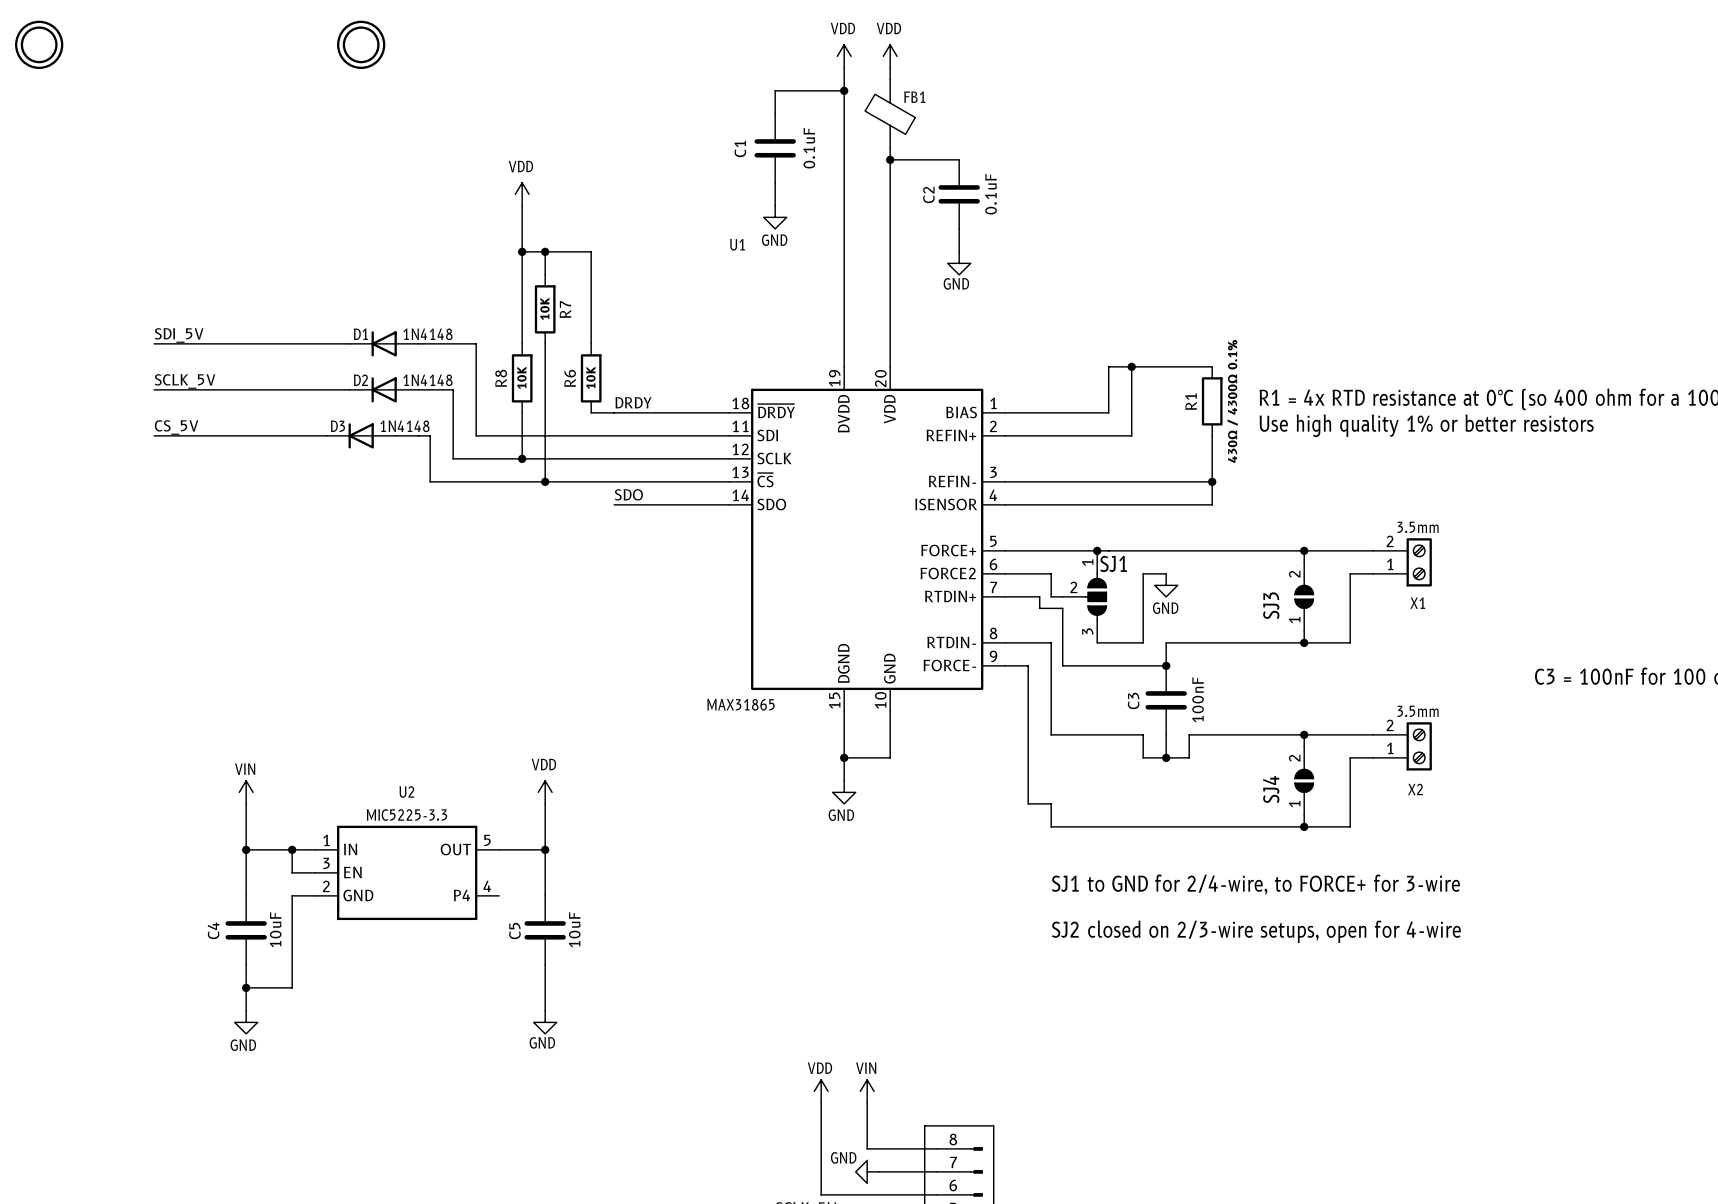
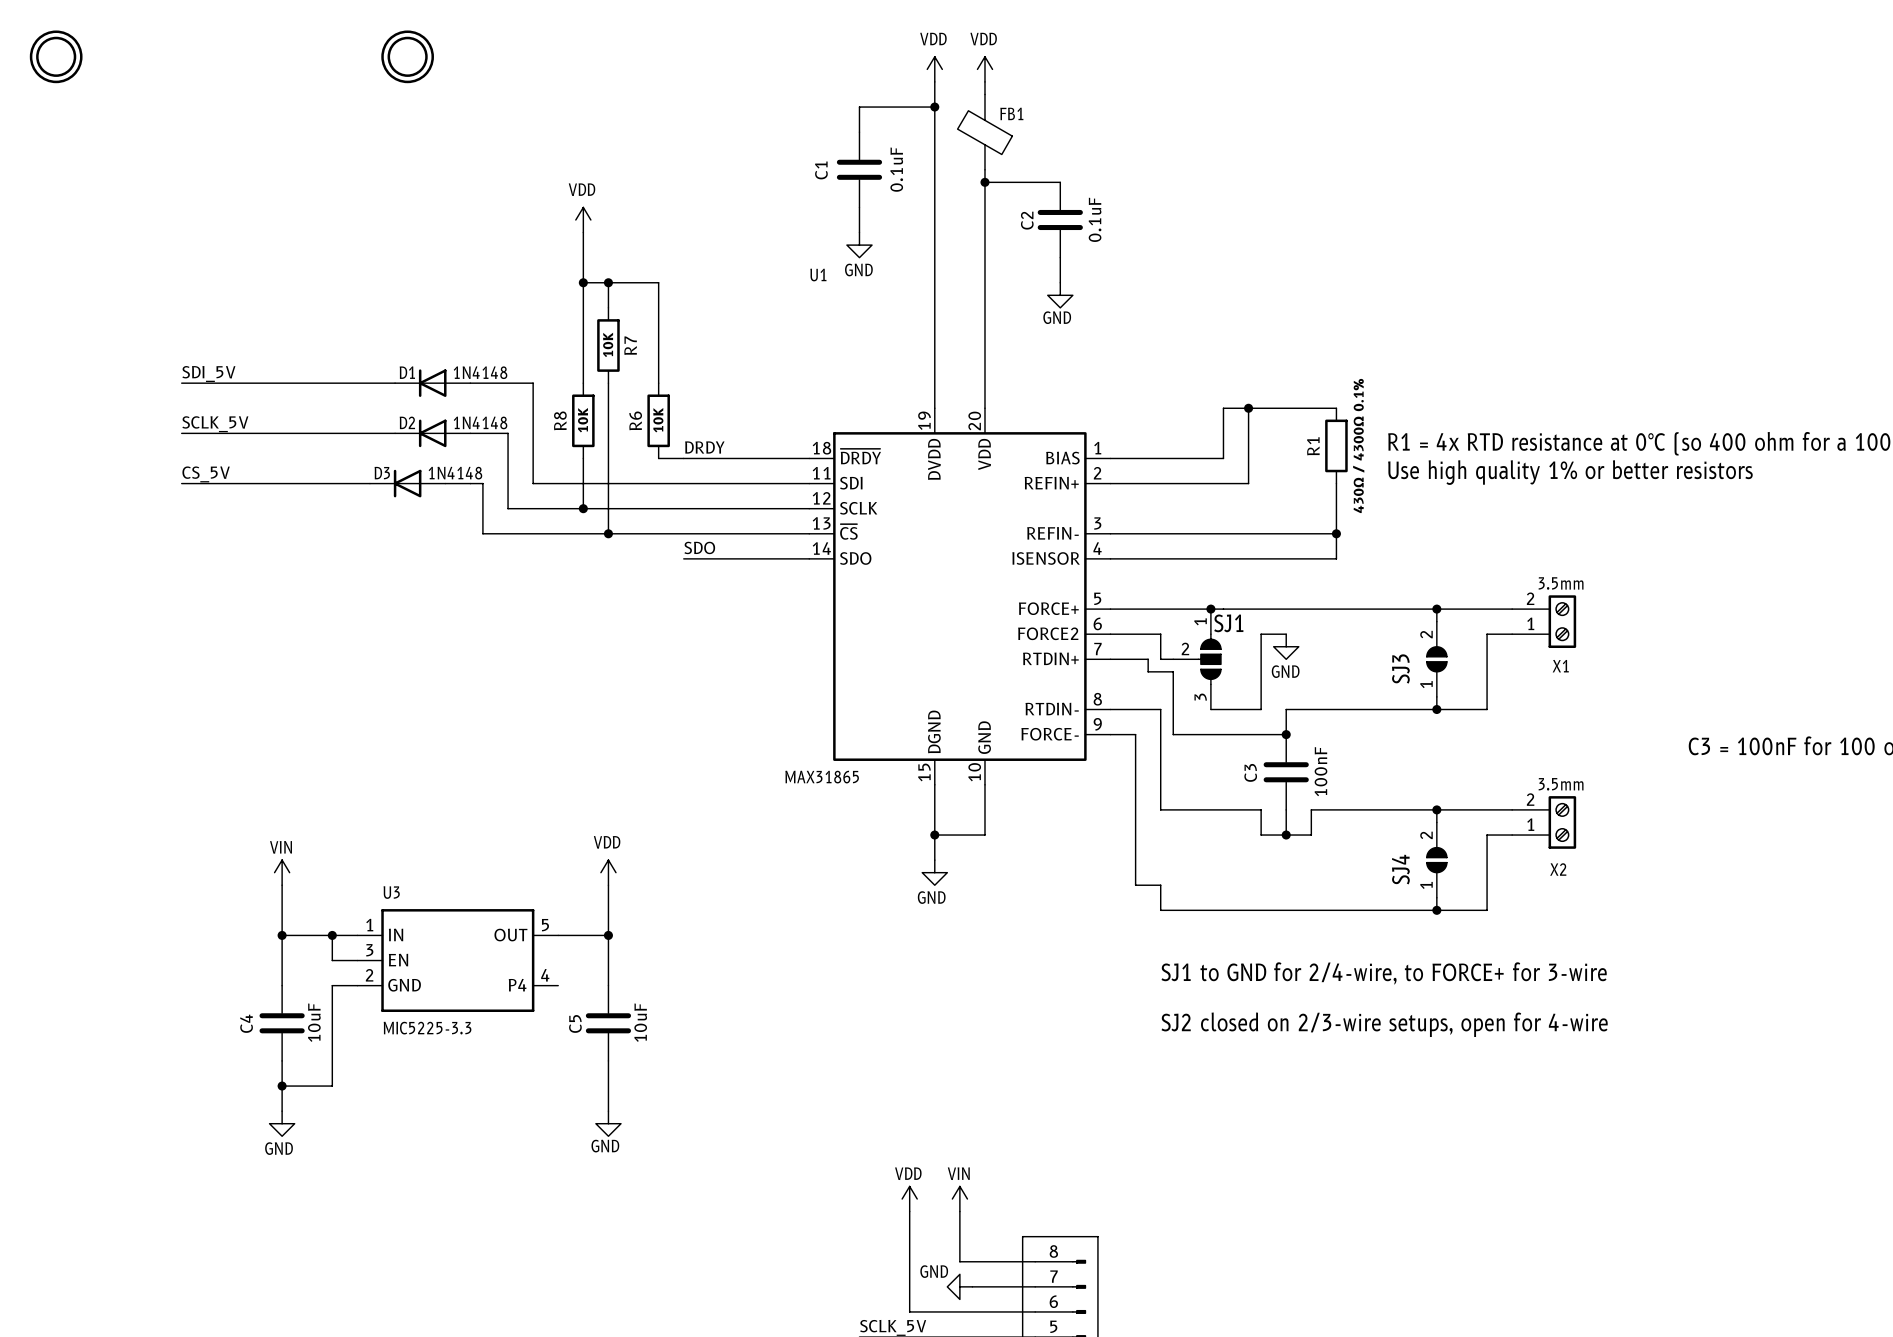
U2 name: U2 (406, 792) -> U3 (391, 892)
U2 value position: MIC5225-3.3 (406, 815) -> MIC5225-3.3 (427, 1028)

